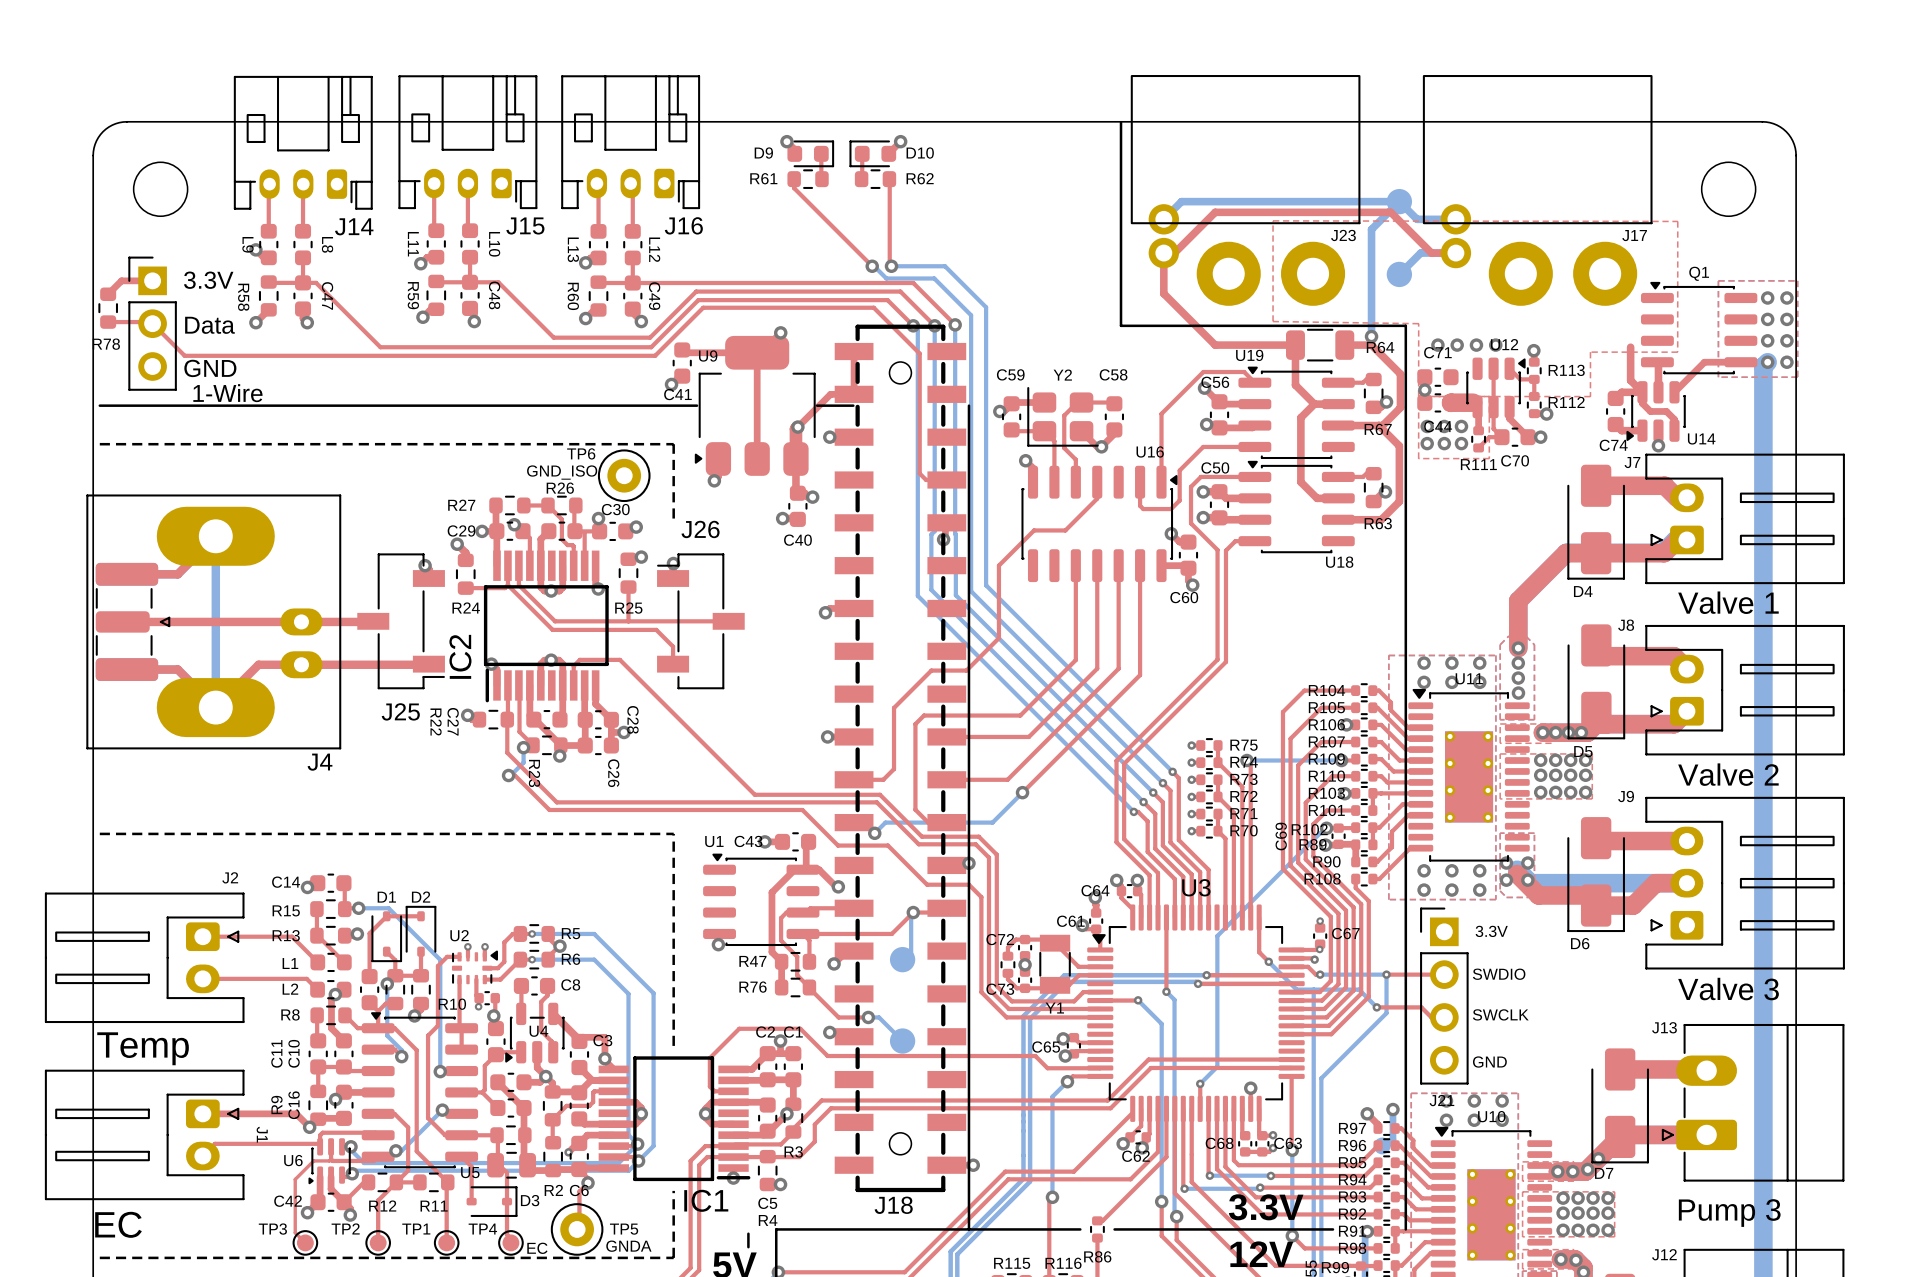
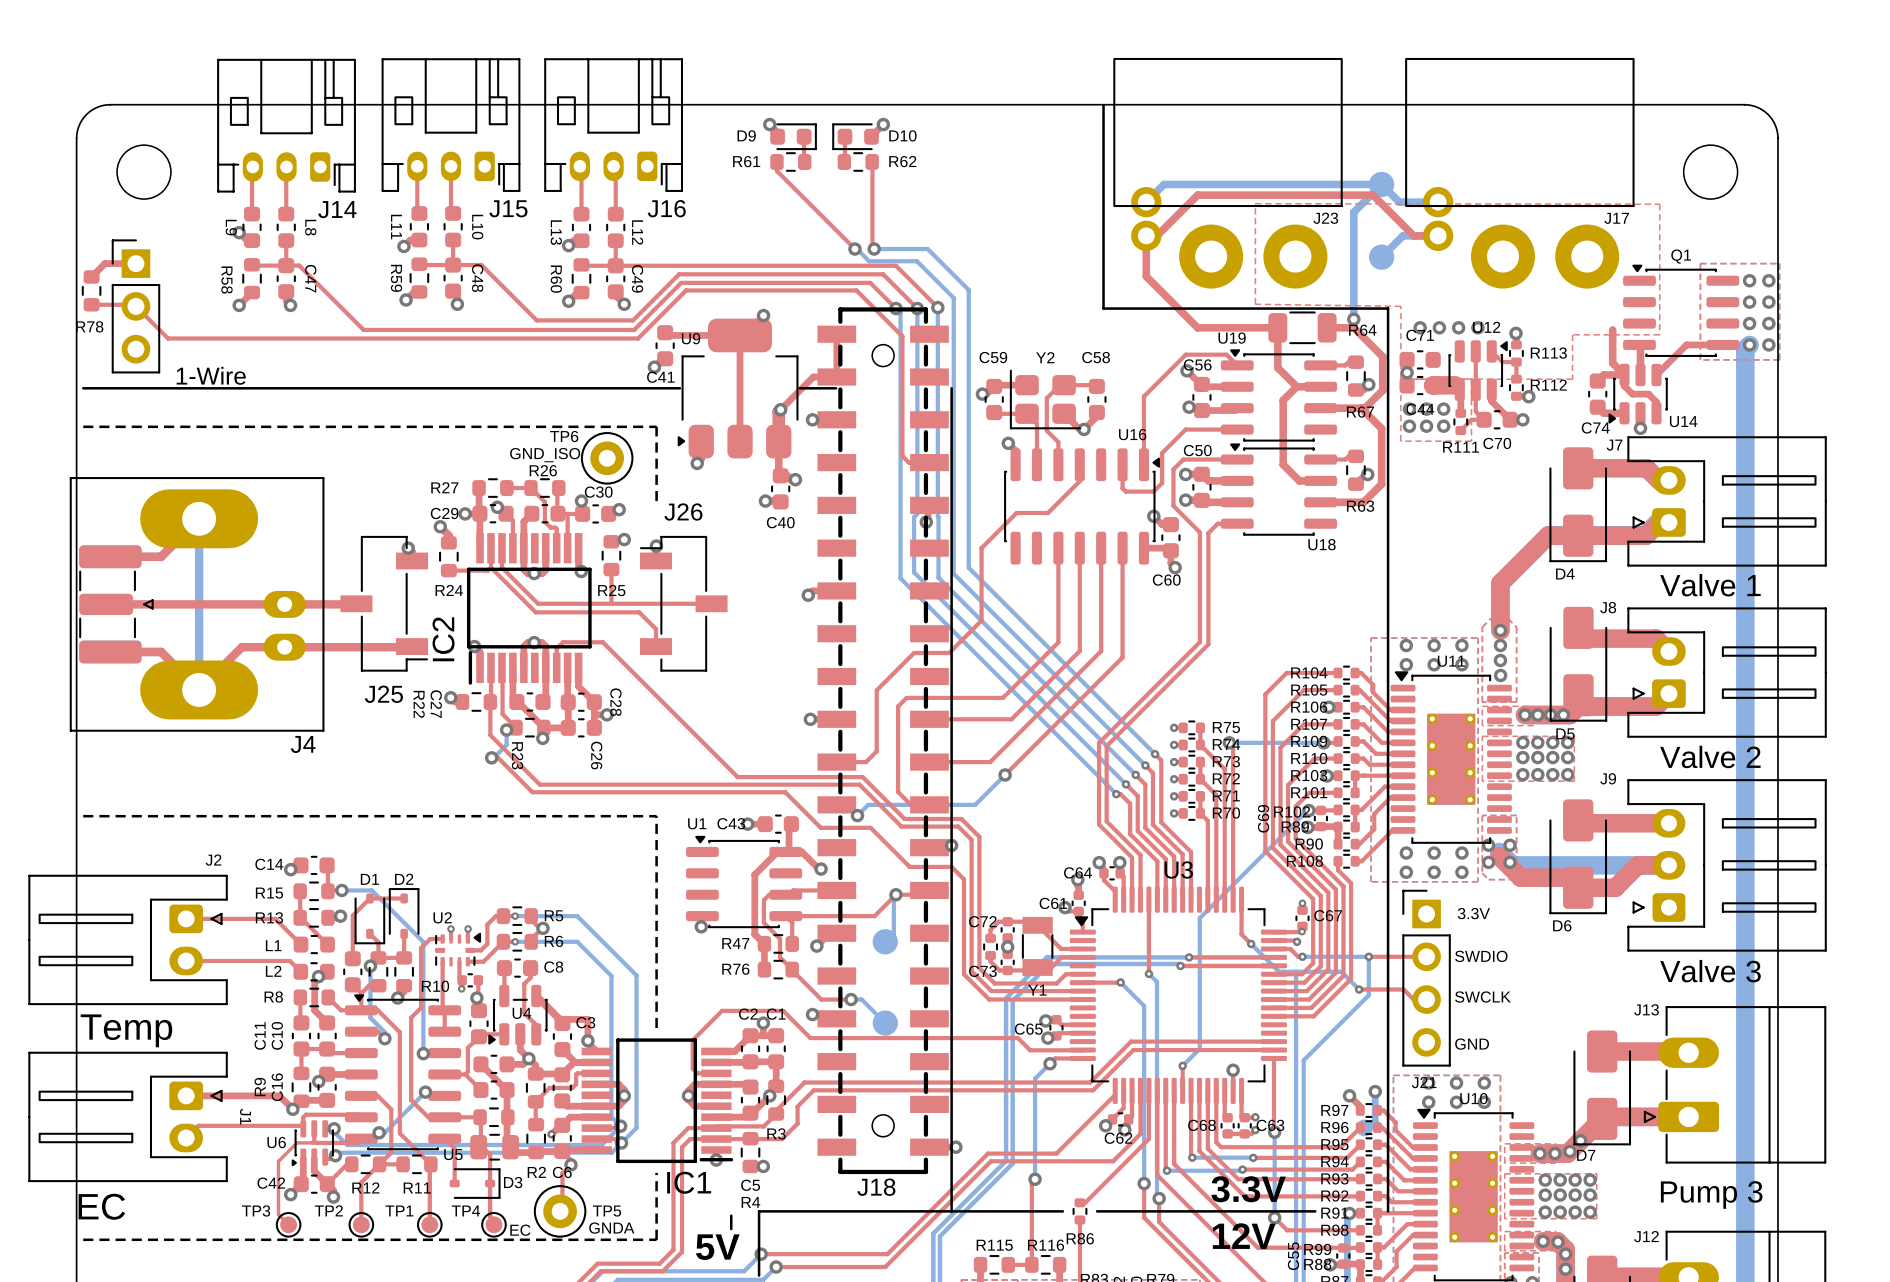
part text: 3.3V (208, 280) -> none
part text: Data (210, 325) -> none
part text: GND (210, 368) -> none

